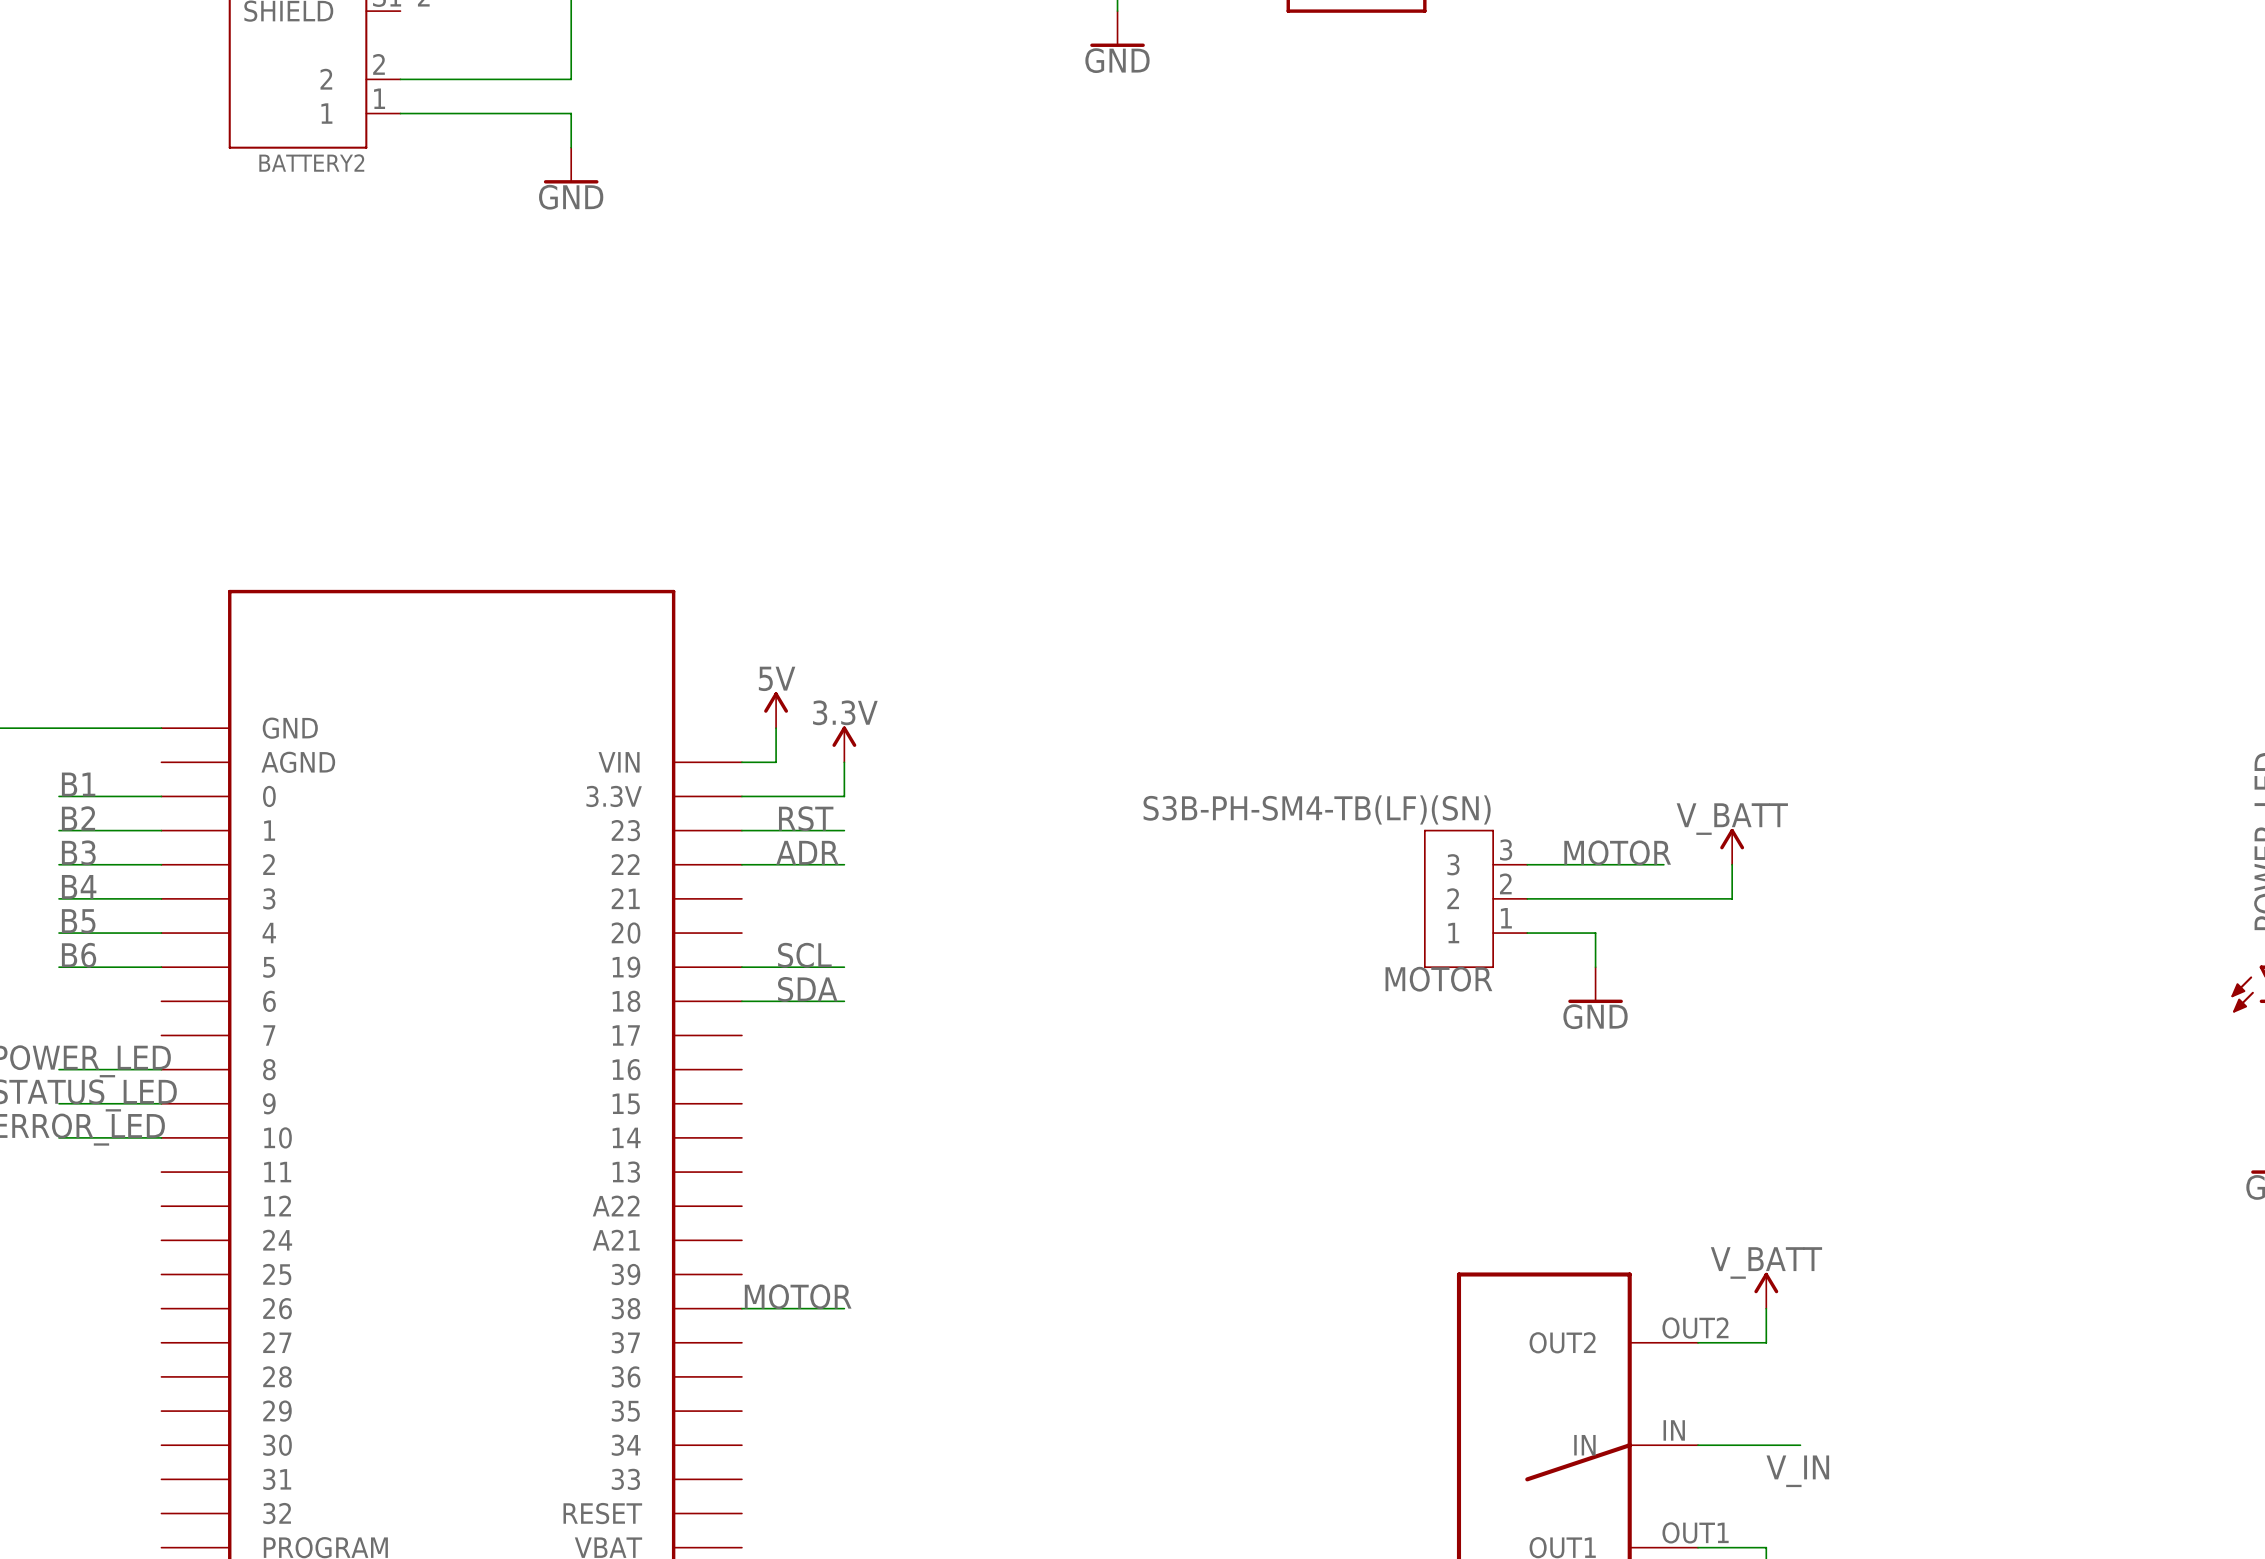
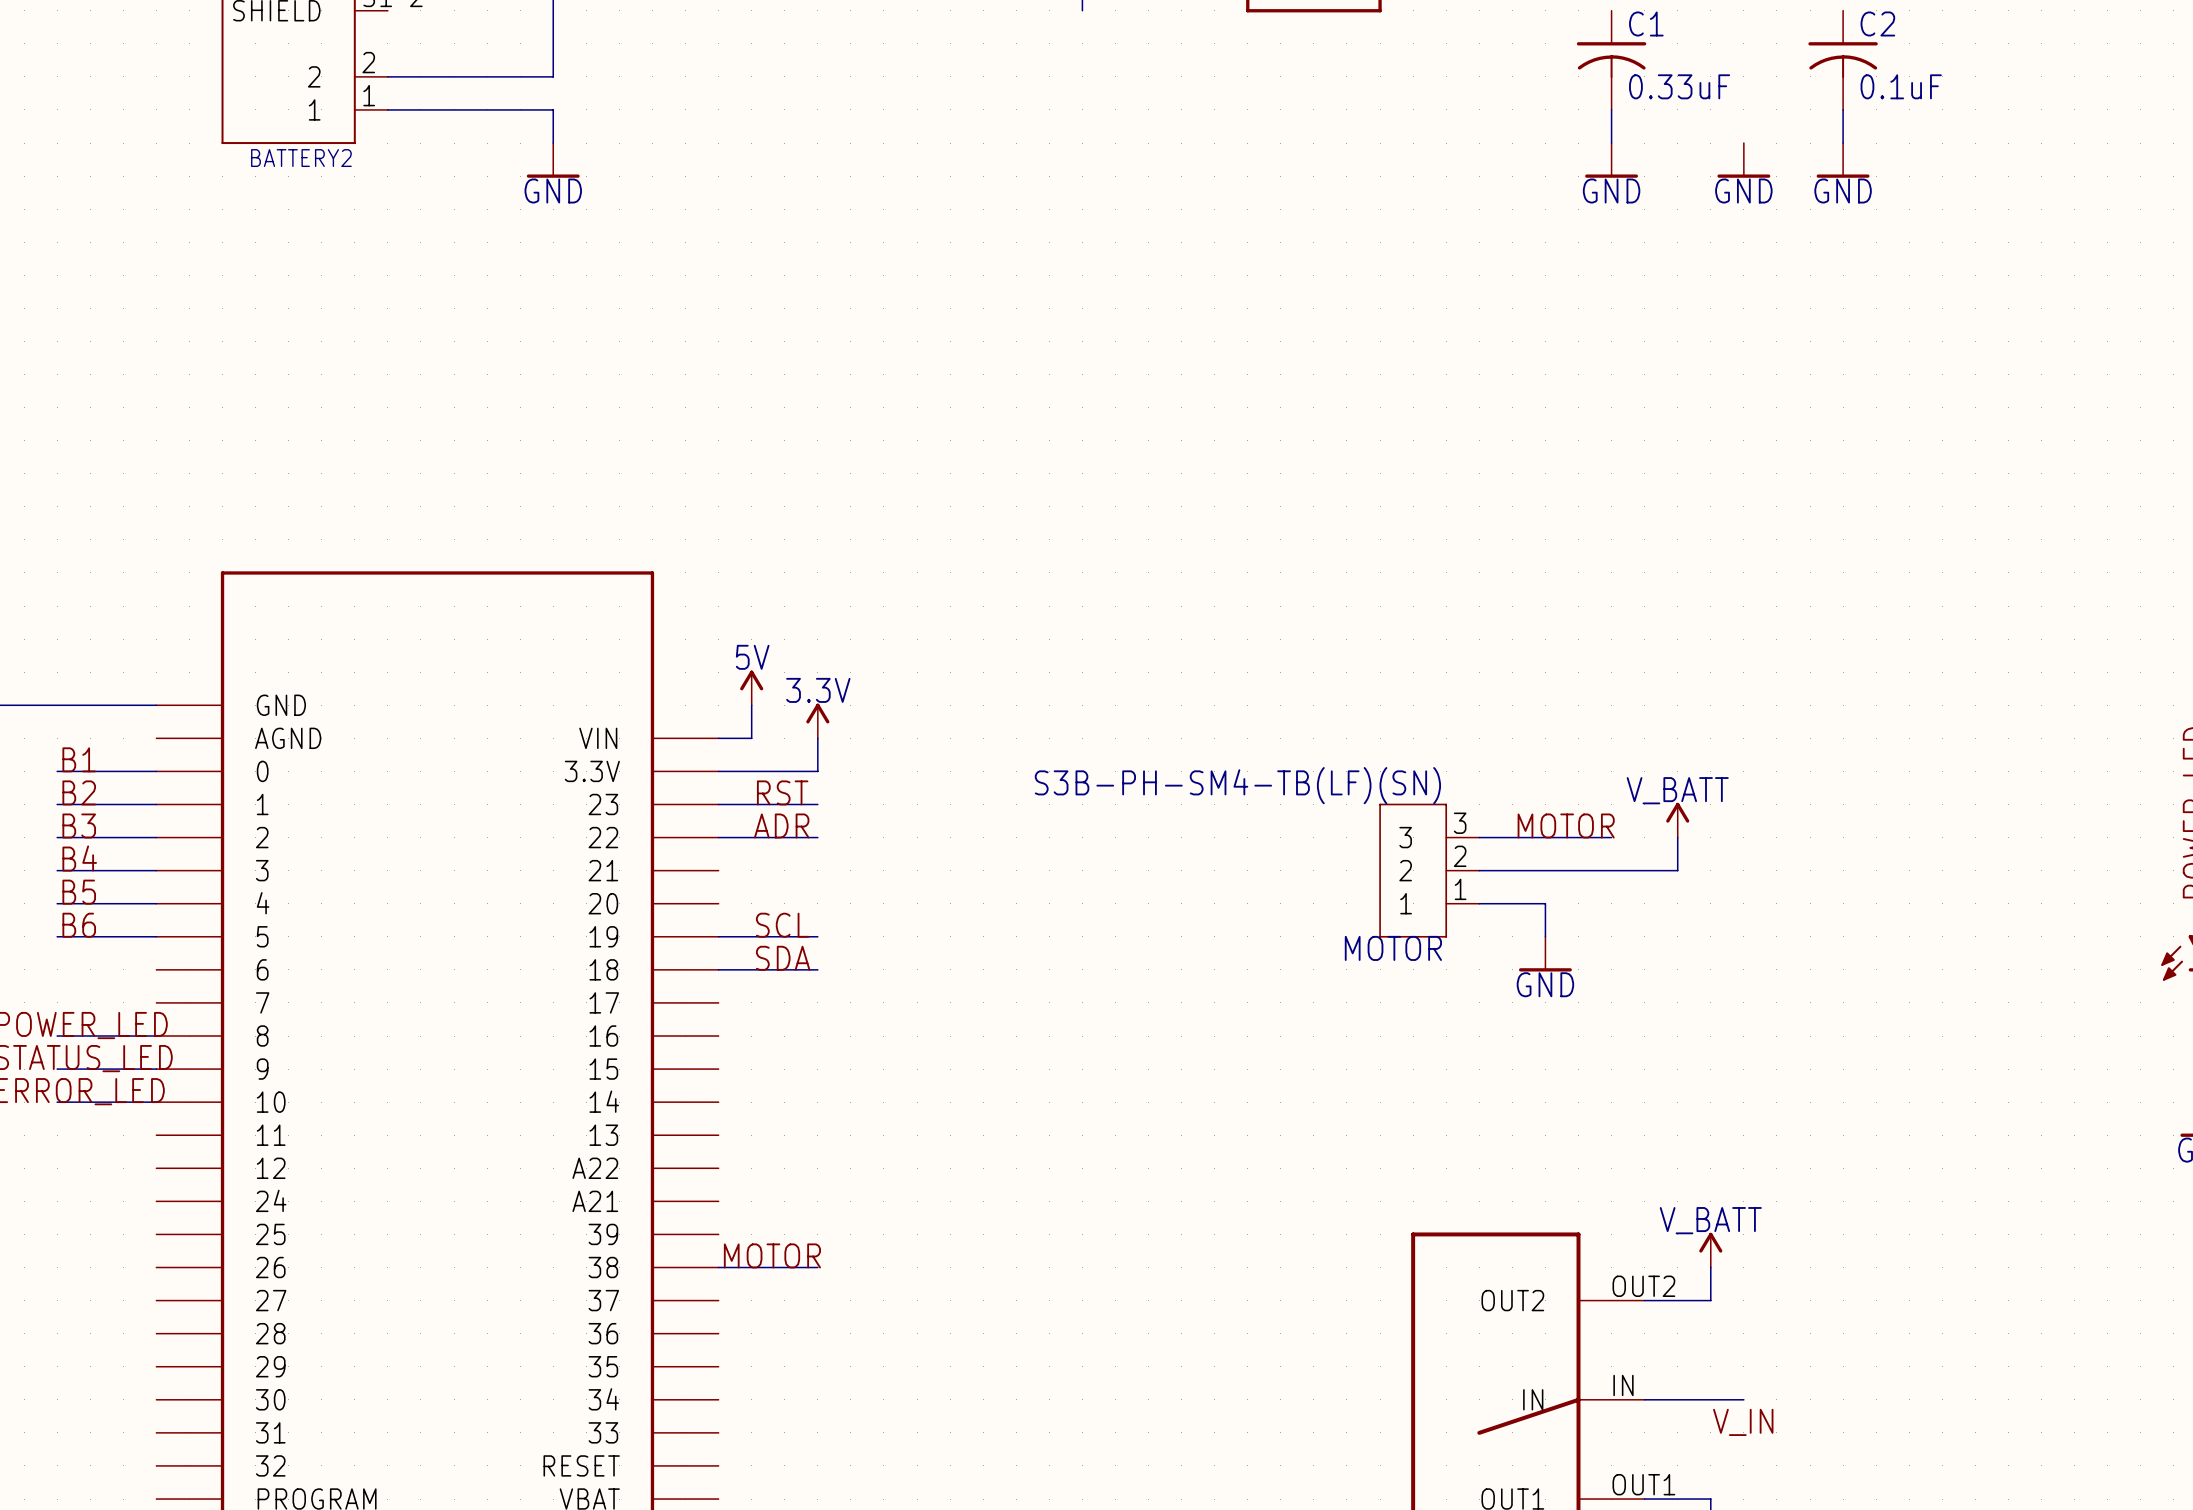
power symbol: GND (1117, 29) -> none
C1: none -> 0.33uF (1611, 60)
C2: none -> 0.1uF (1843, 60)
wire: none -> (1611, 109) (1611, 143)
wire: none -> (1843, 109) (1843, 143)
power symbol: none -> GND (1611, 160)
power symbol: none -> GND (1743, 160)
power symbol: none -> GND (1843, 160)

